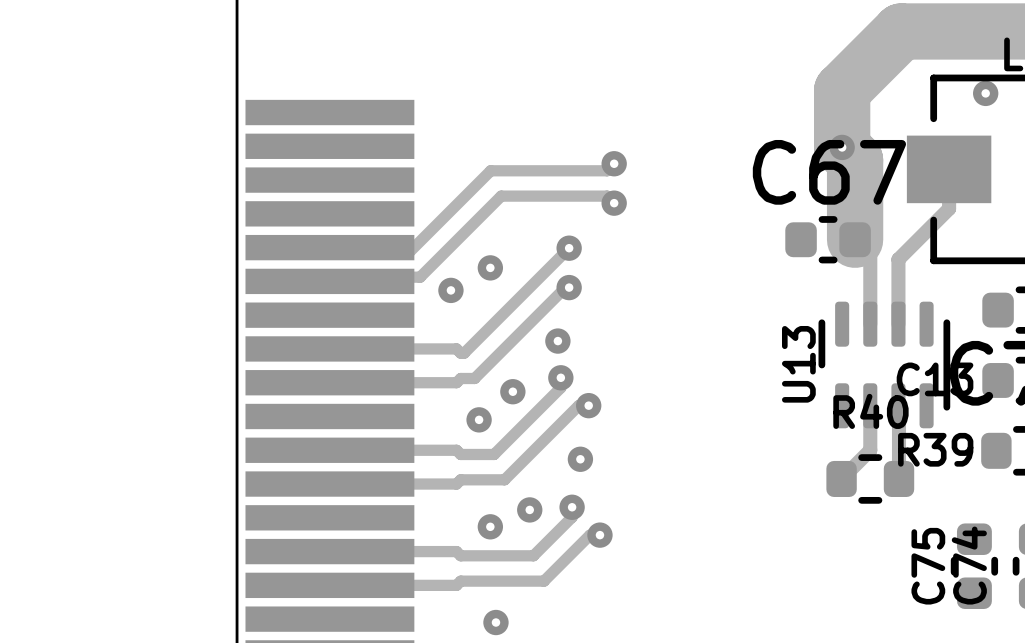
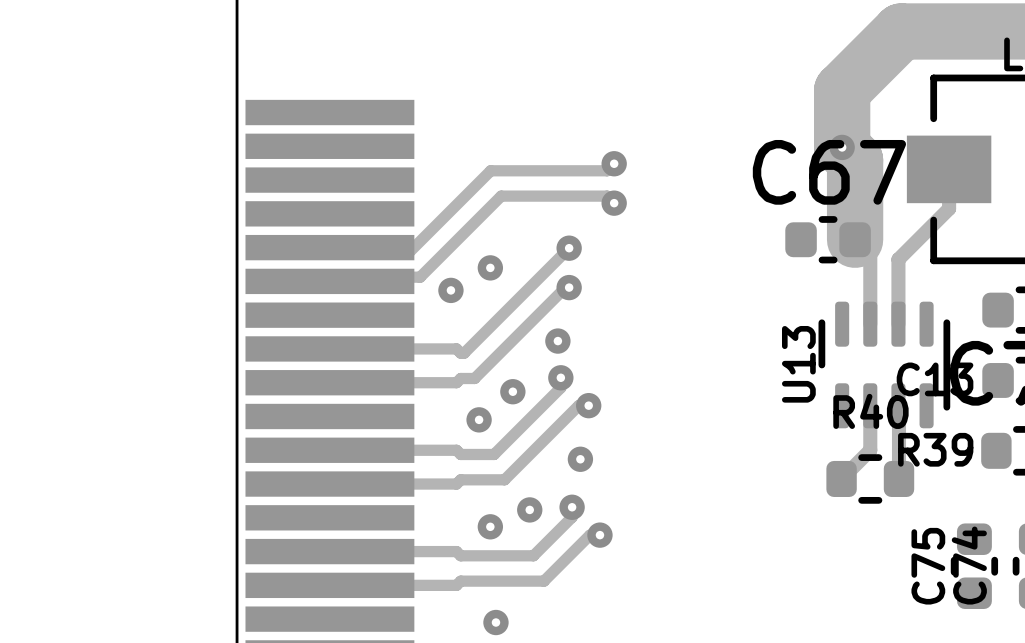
via: (985, 93) -> none

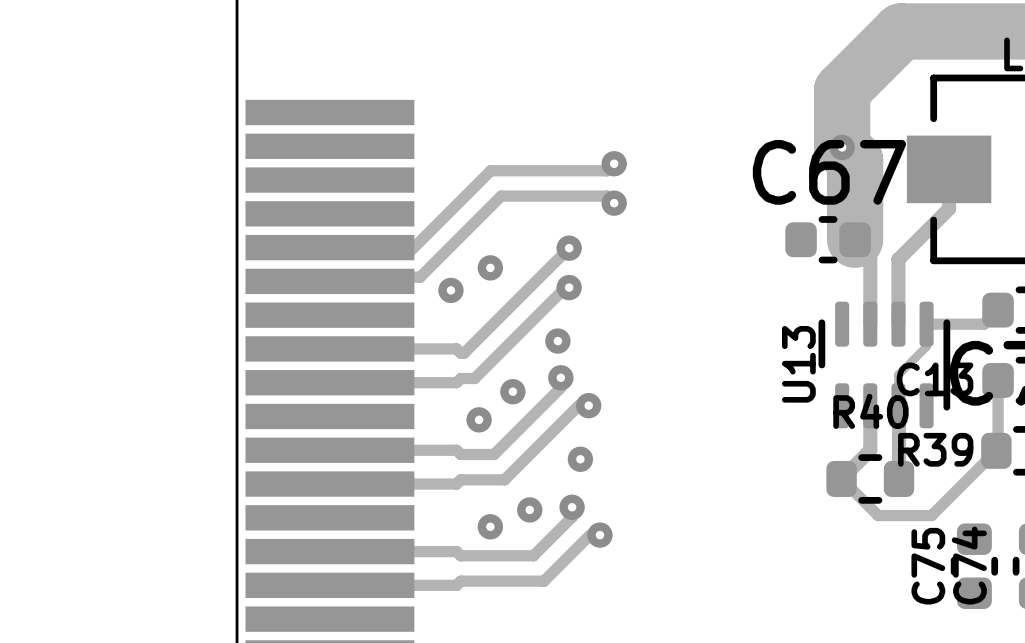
track: none -> (998, 310) (983, 324) (926, 324) (926, 346) (898, 374) (898, 405)
track: none -> (998, 380) (998, 449) (931, 515) (878, 515) (841, 478)
via: (495, 622) -> none

